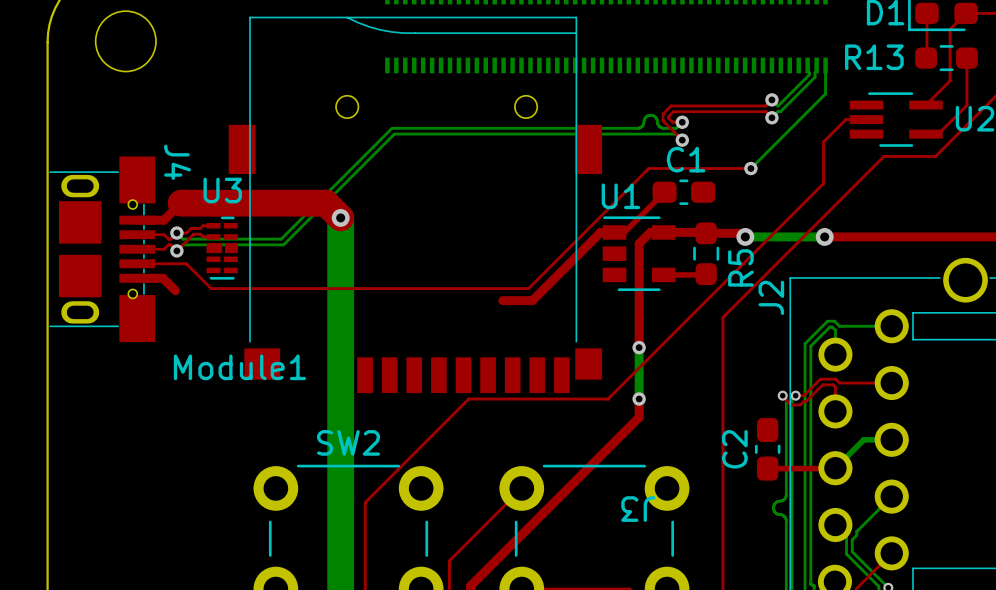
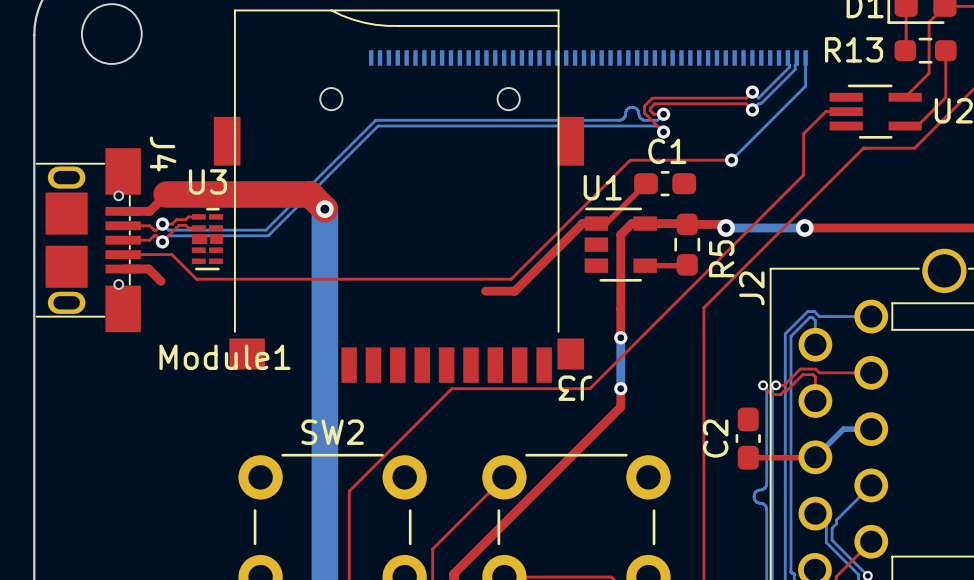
J3 name position: J3 (638, 509) -> J3 (575, 388)

